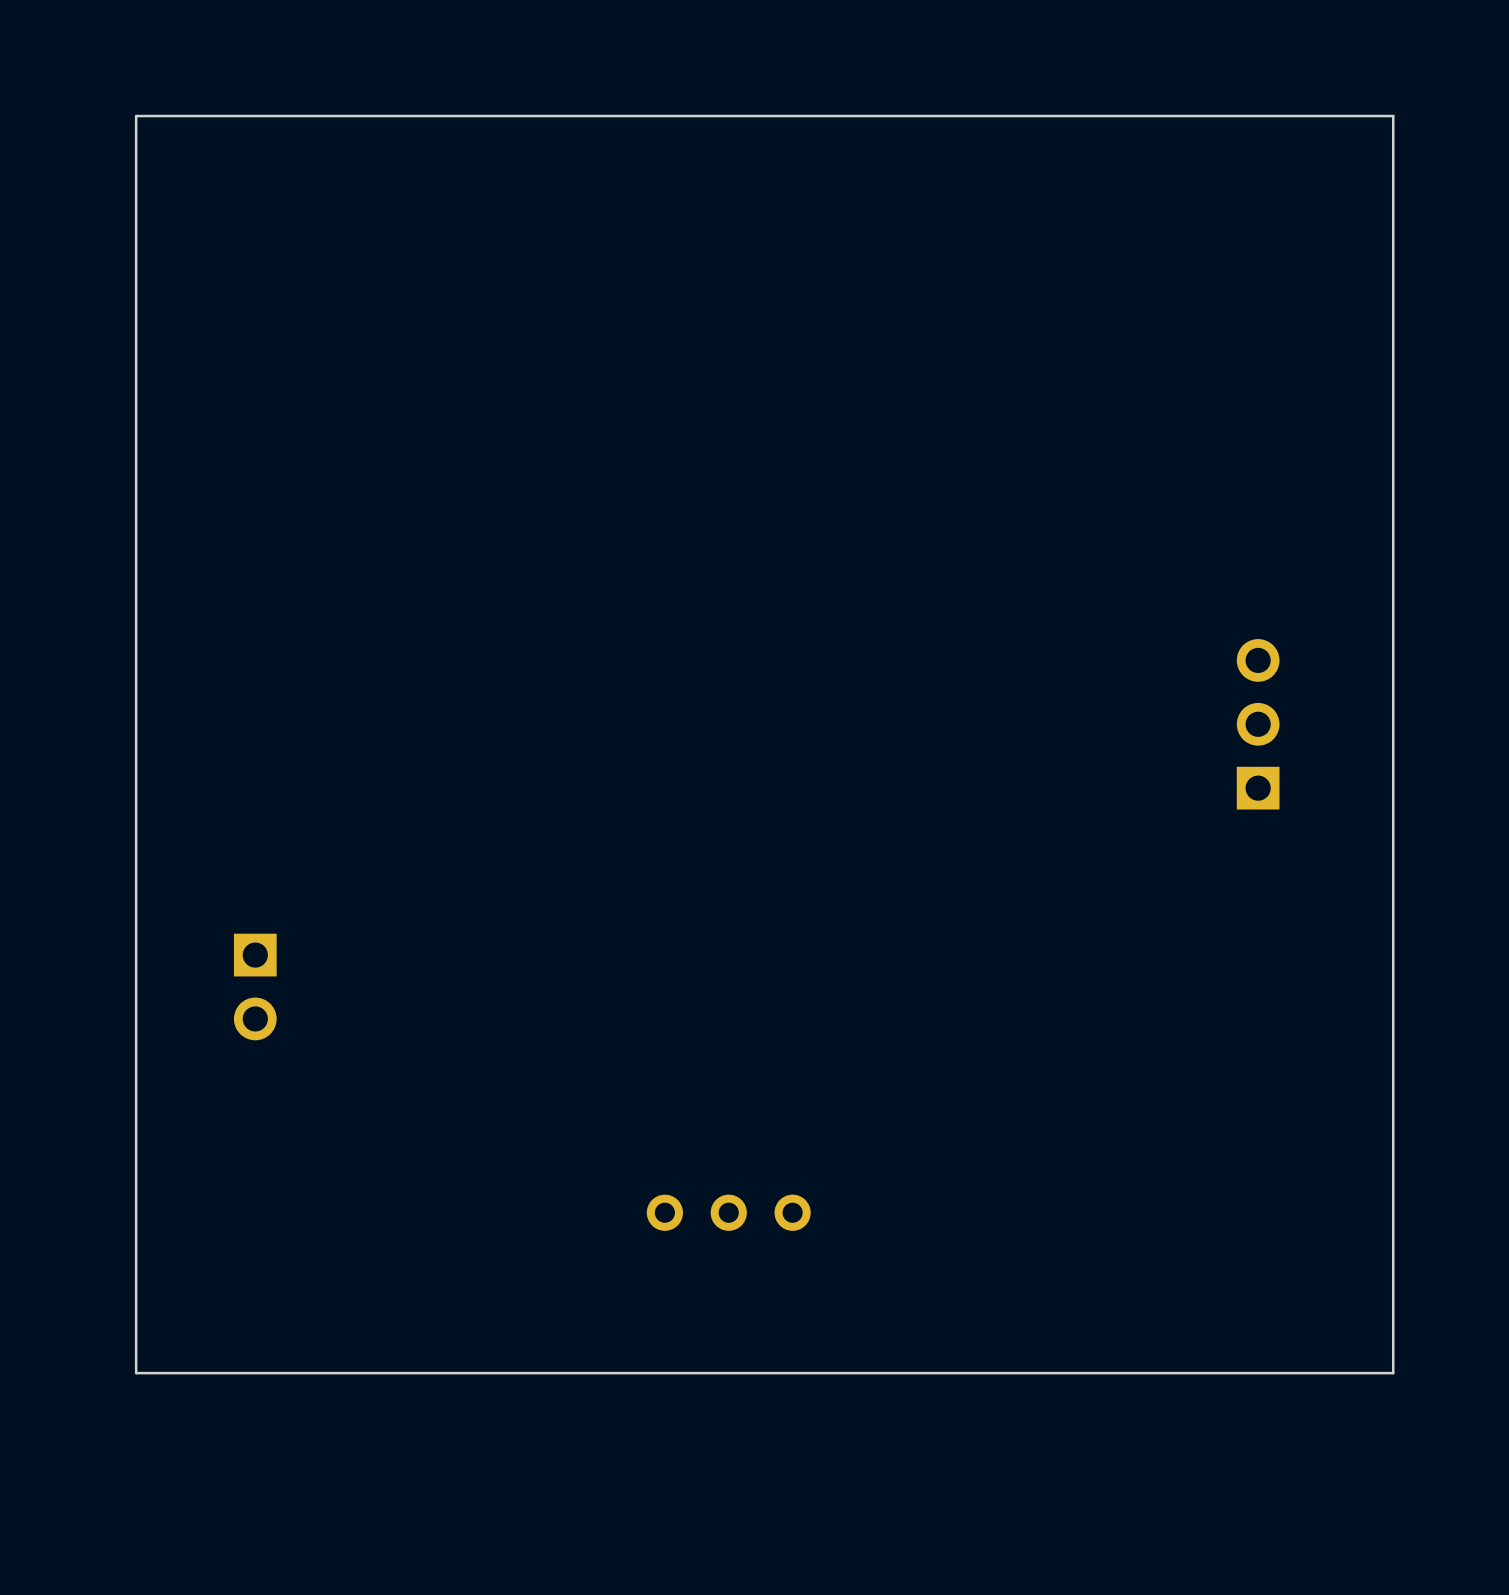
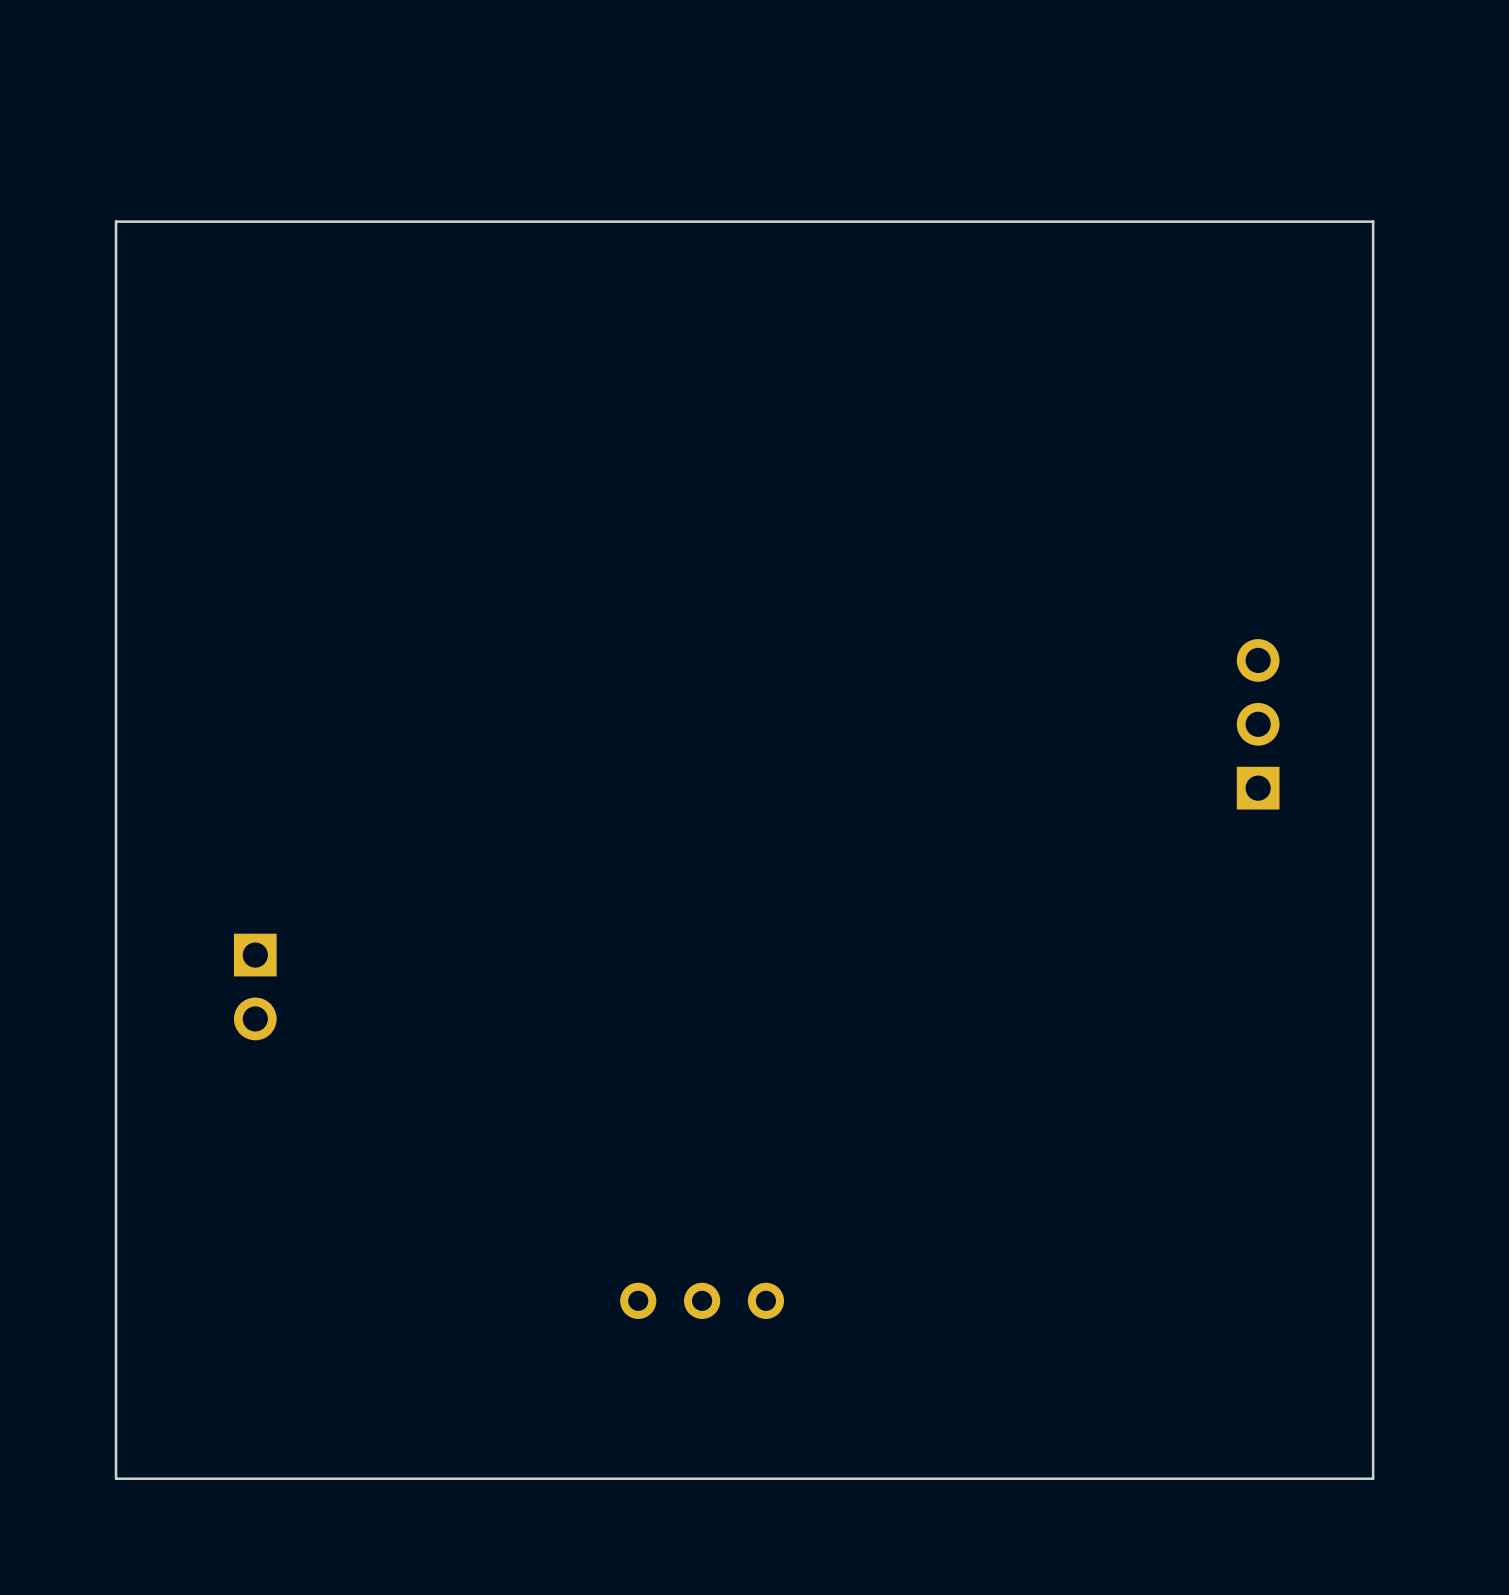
board edge: (1393, 116) (136, 116) (136, 1373) (1393, 1373) (1393, 116) -> (1373, 221) (116, 221) (116, 1478) (1373, 1478) (1373, 221)
part position: (728, 1212) -> (702, 1300)

